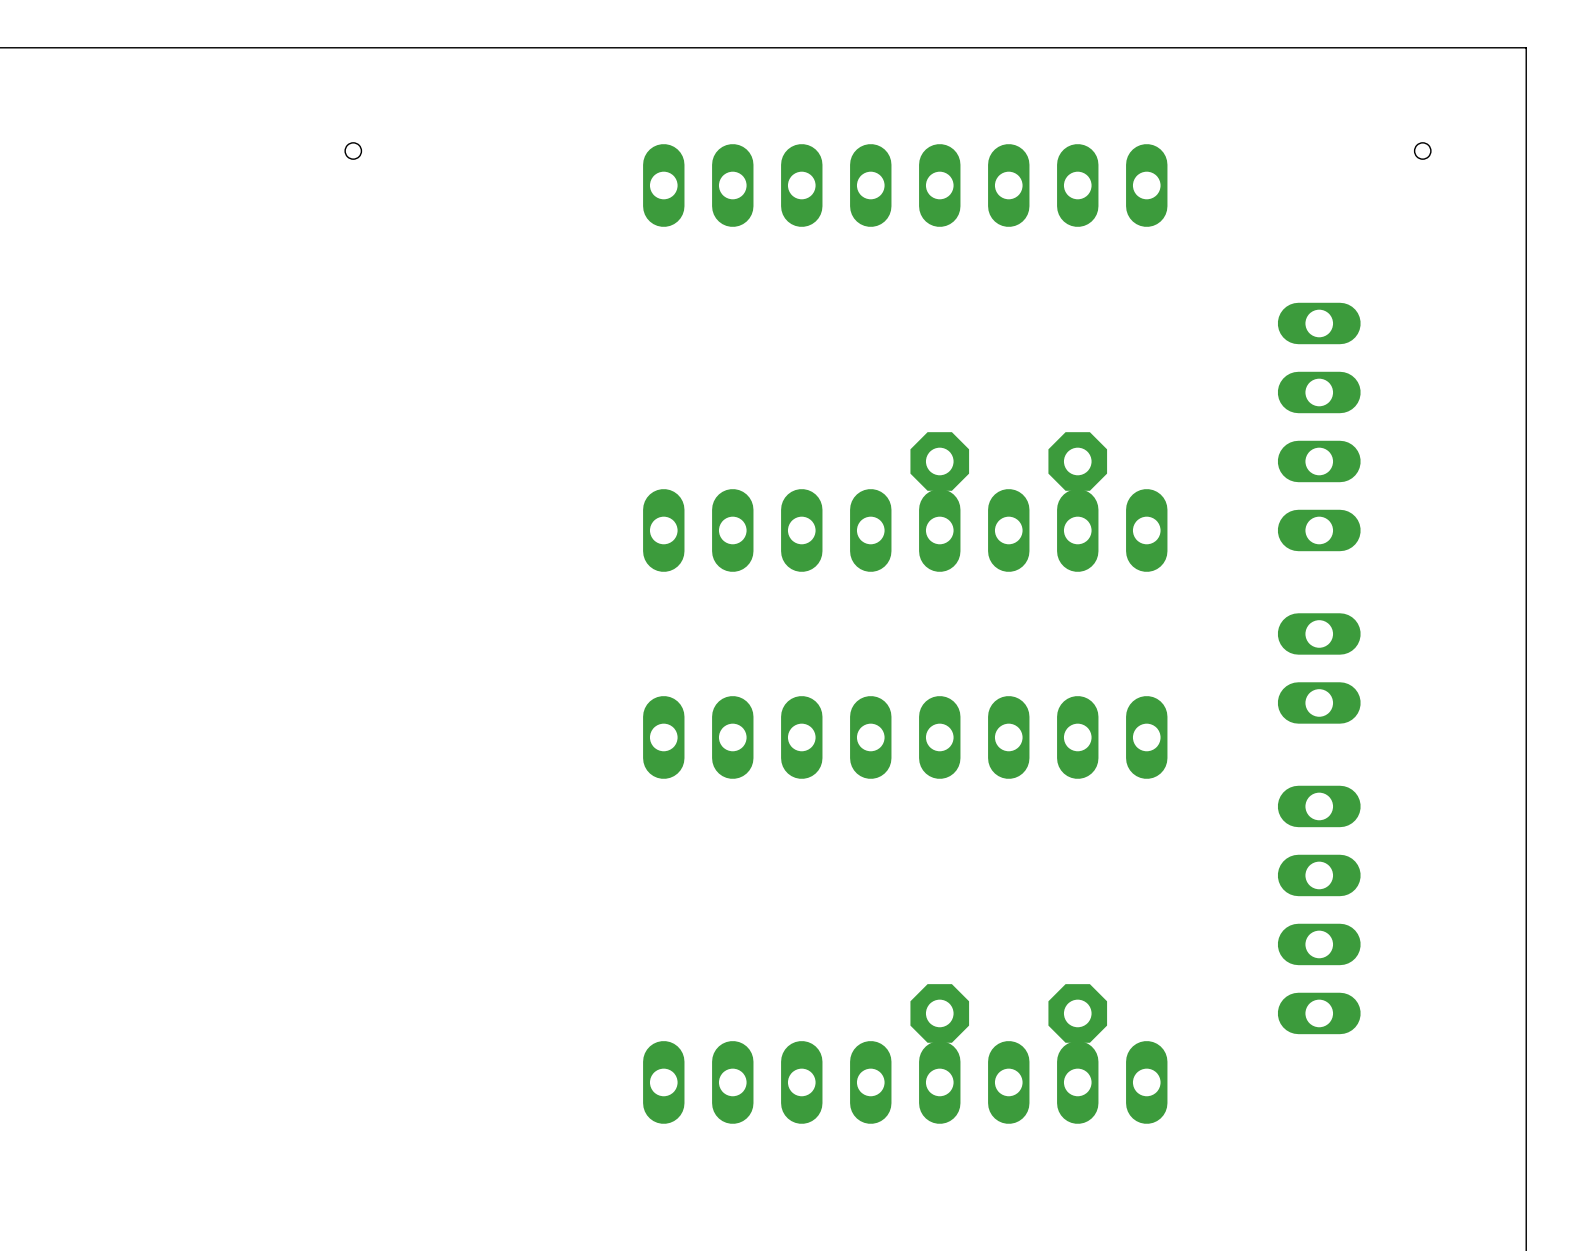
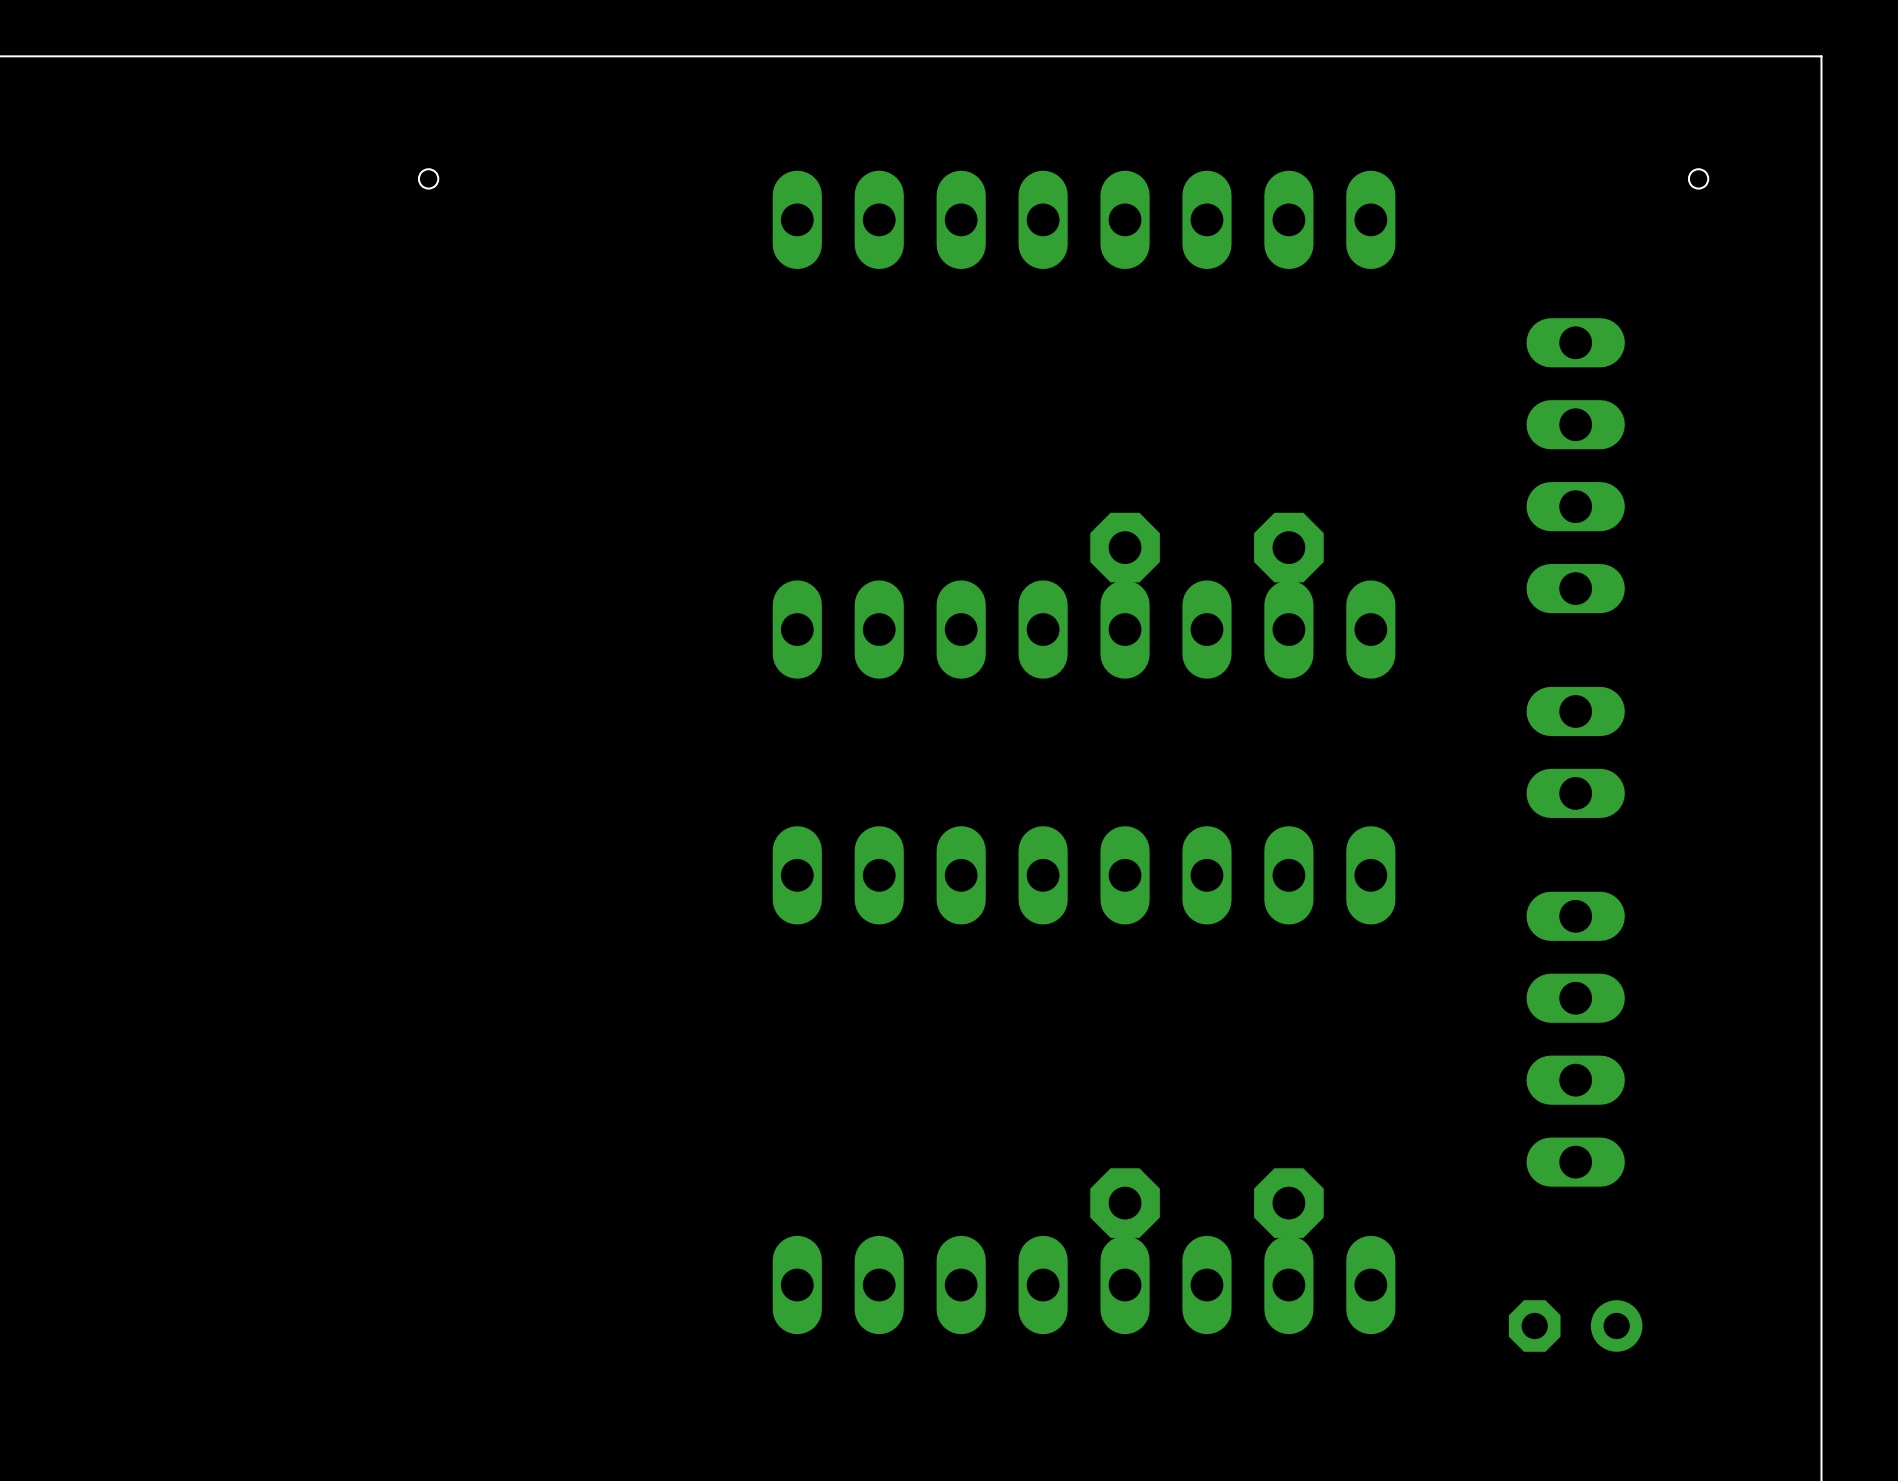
part position: (1319, 426) -> (1575, 465)
part position: (1319, 668) -> (1575, 752)
part position: (1319, 909) -> (1575, 1039)
part: none -> (1575, 1325)

